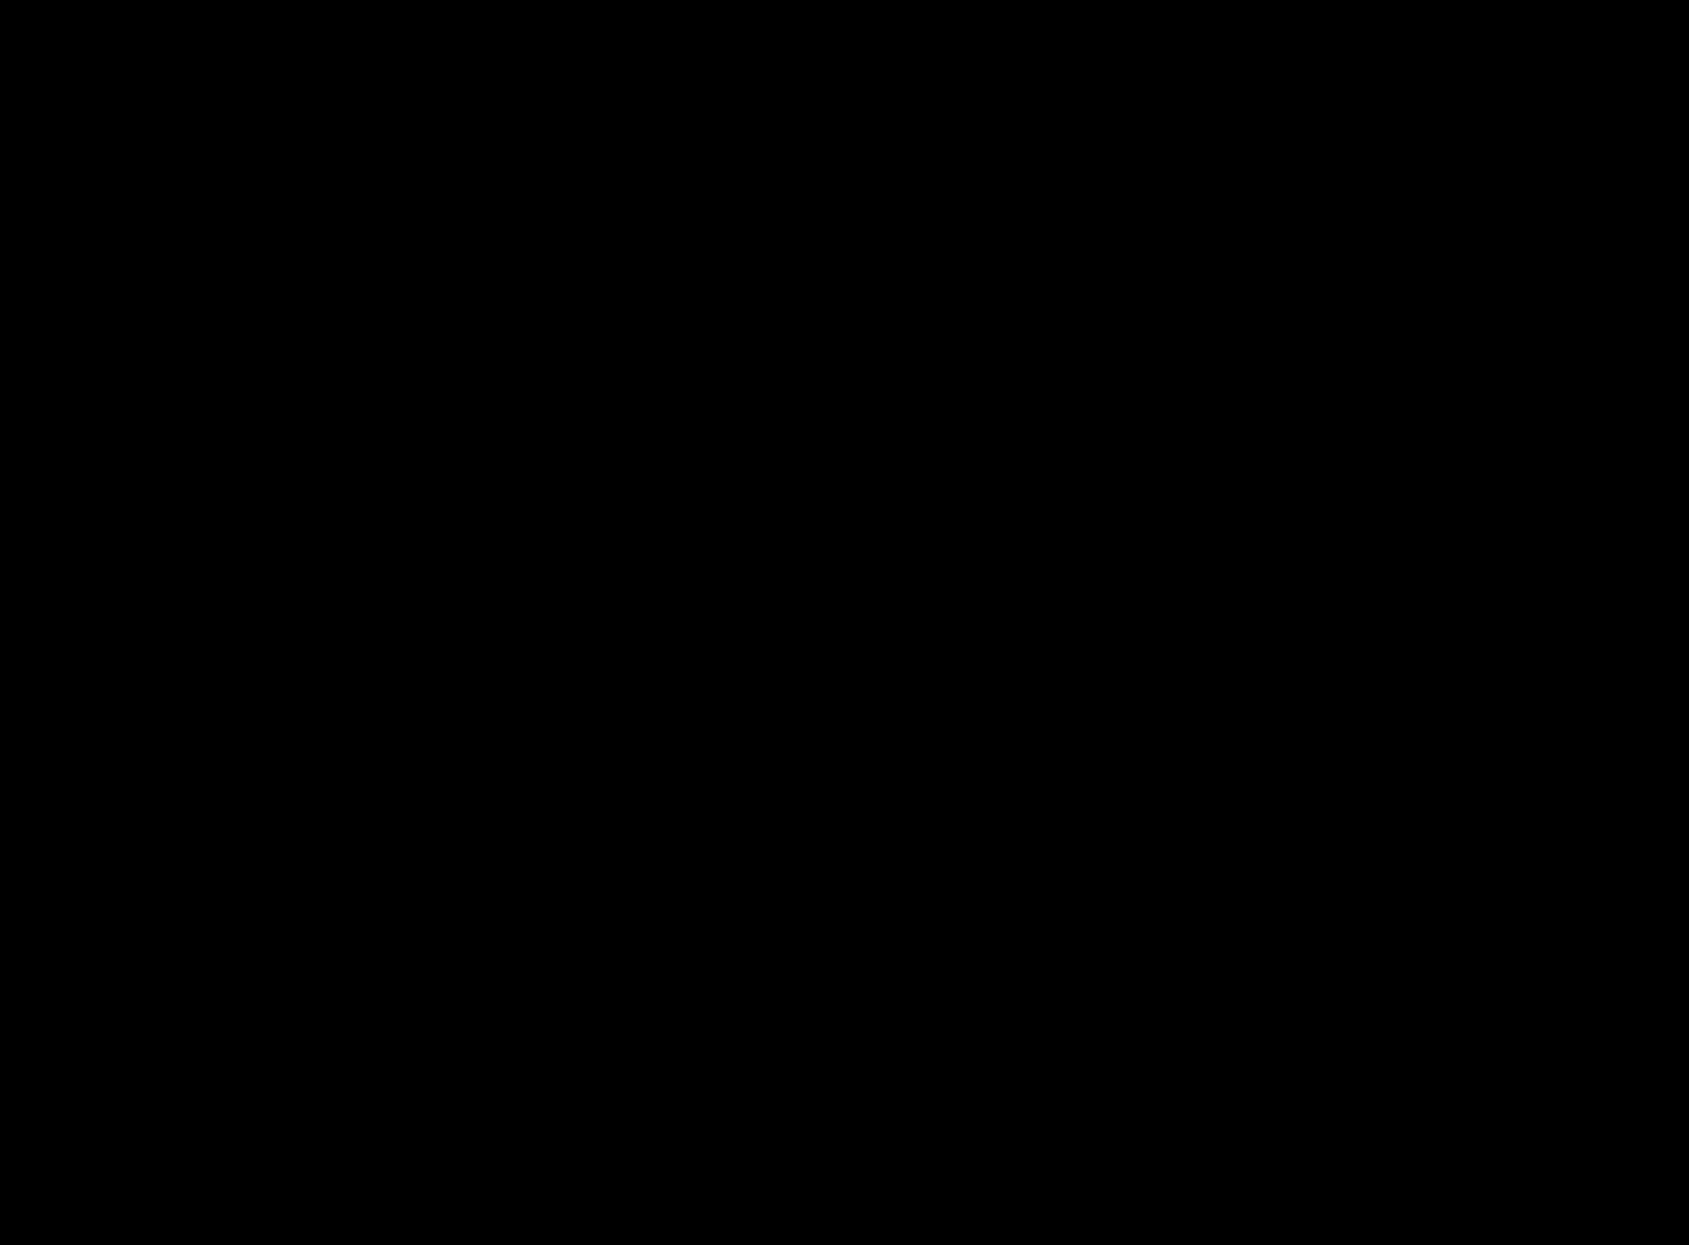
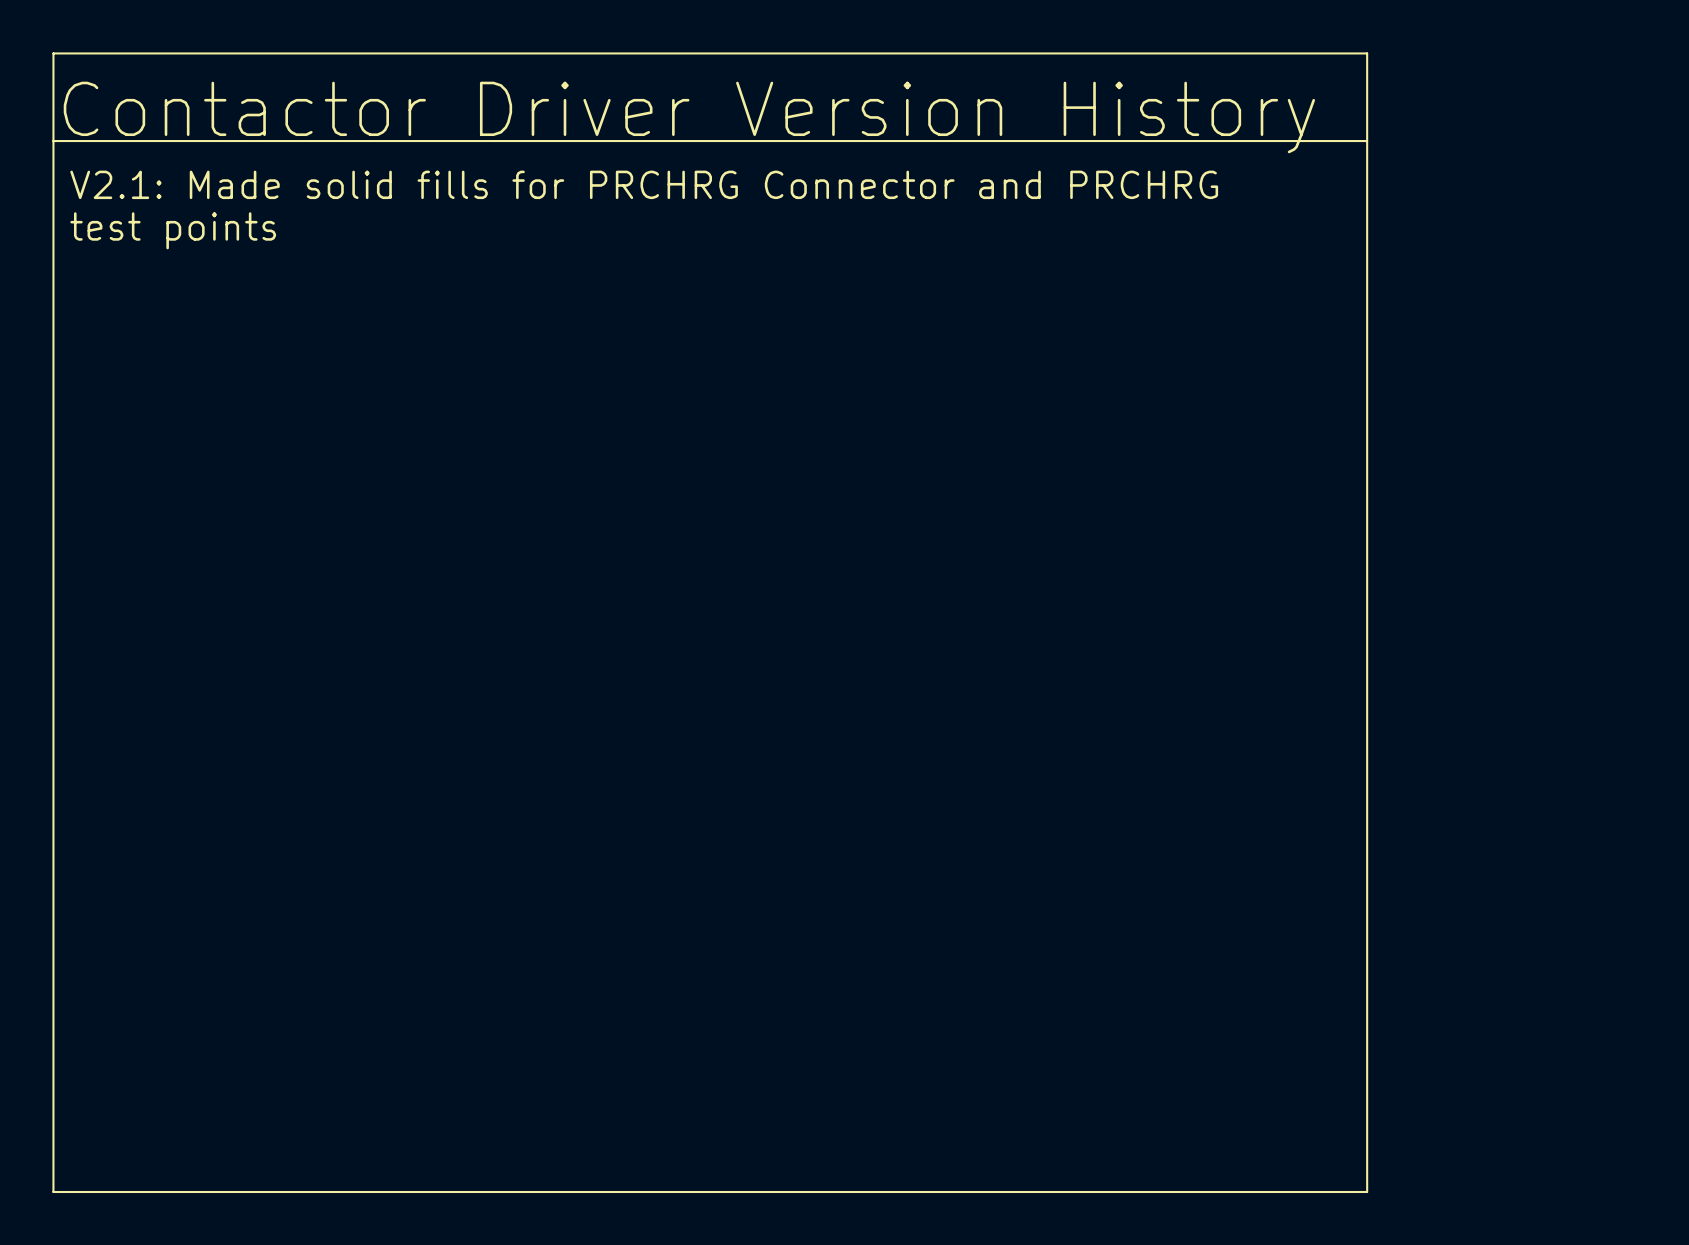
line: none -> (53, 53) (1367, 53) (1367, 1191) (53, 1191) (53, 53)
text: none -> Contactor Driver Version History (689, 117)
line: none -> (53, 141) (1367, 141)
text: none -> V2.1: Made solid fills for PRCHRG Connector and PRCHRG (644, 184)
text: none -> test points (173, 230)

